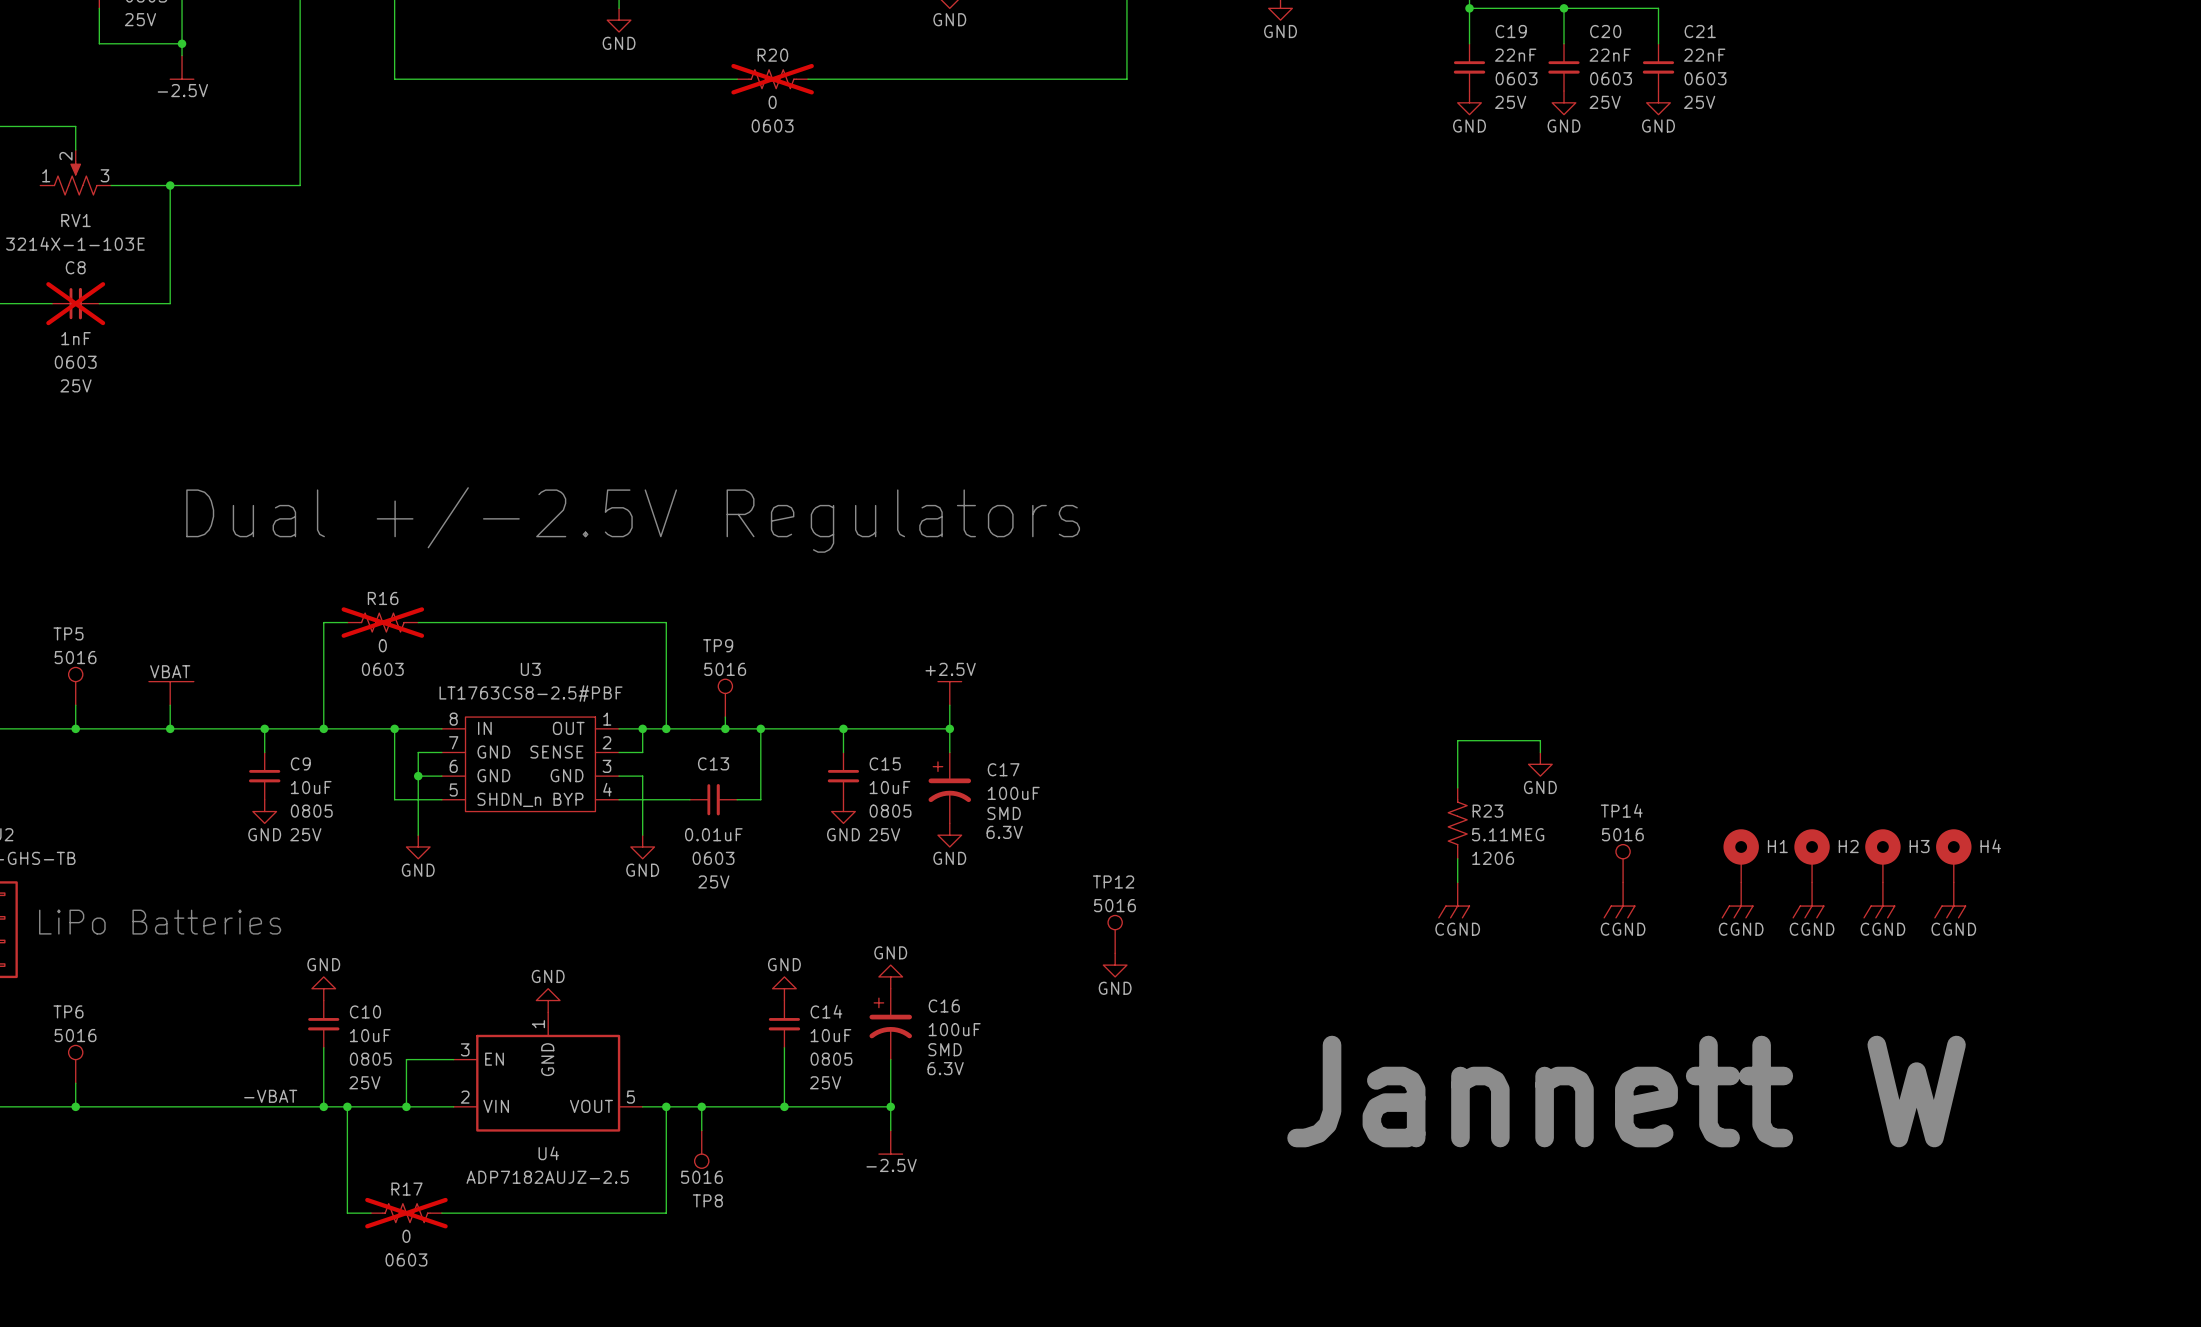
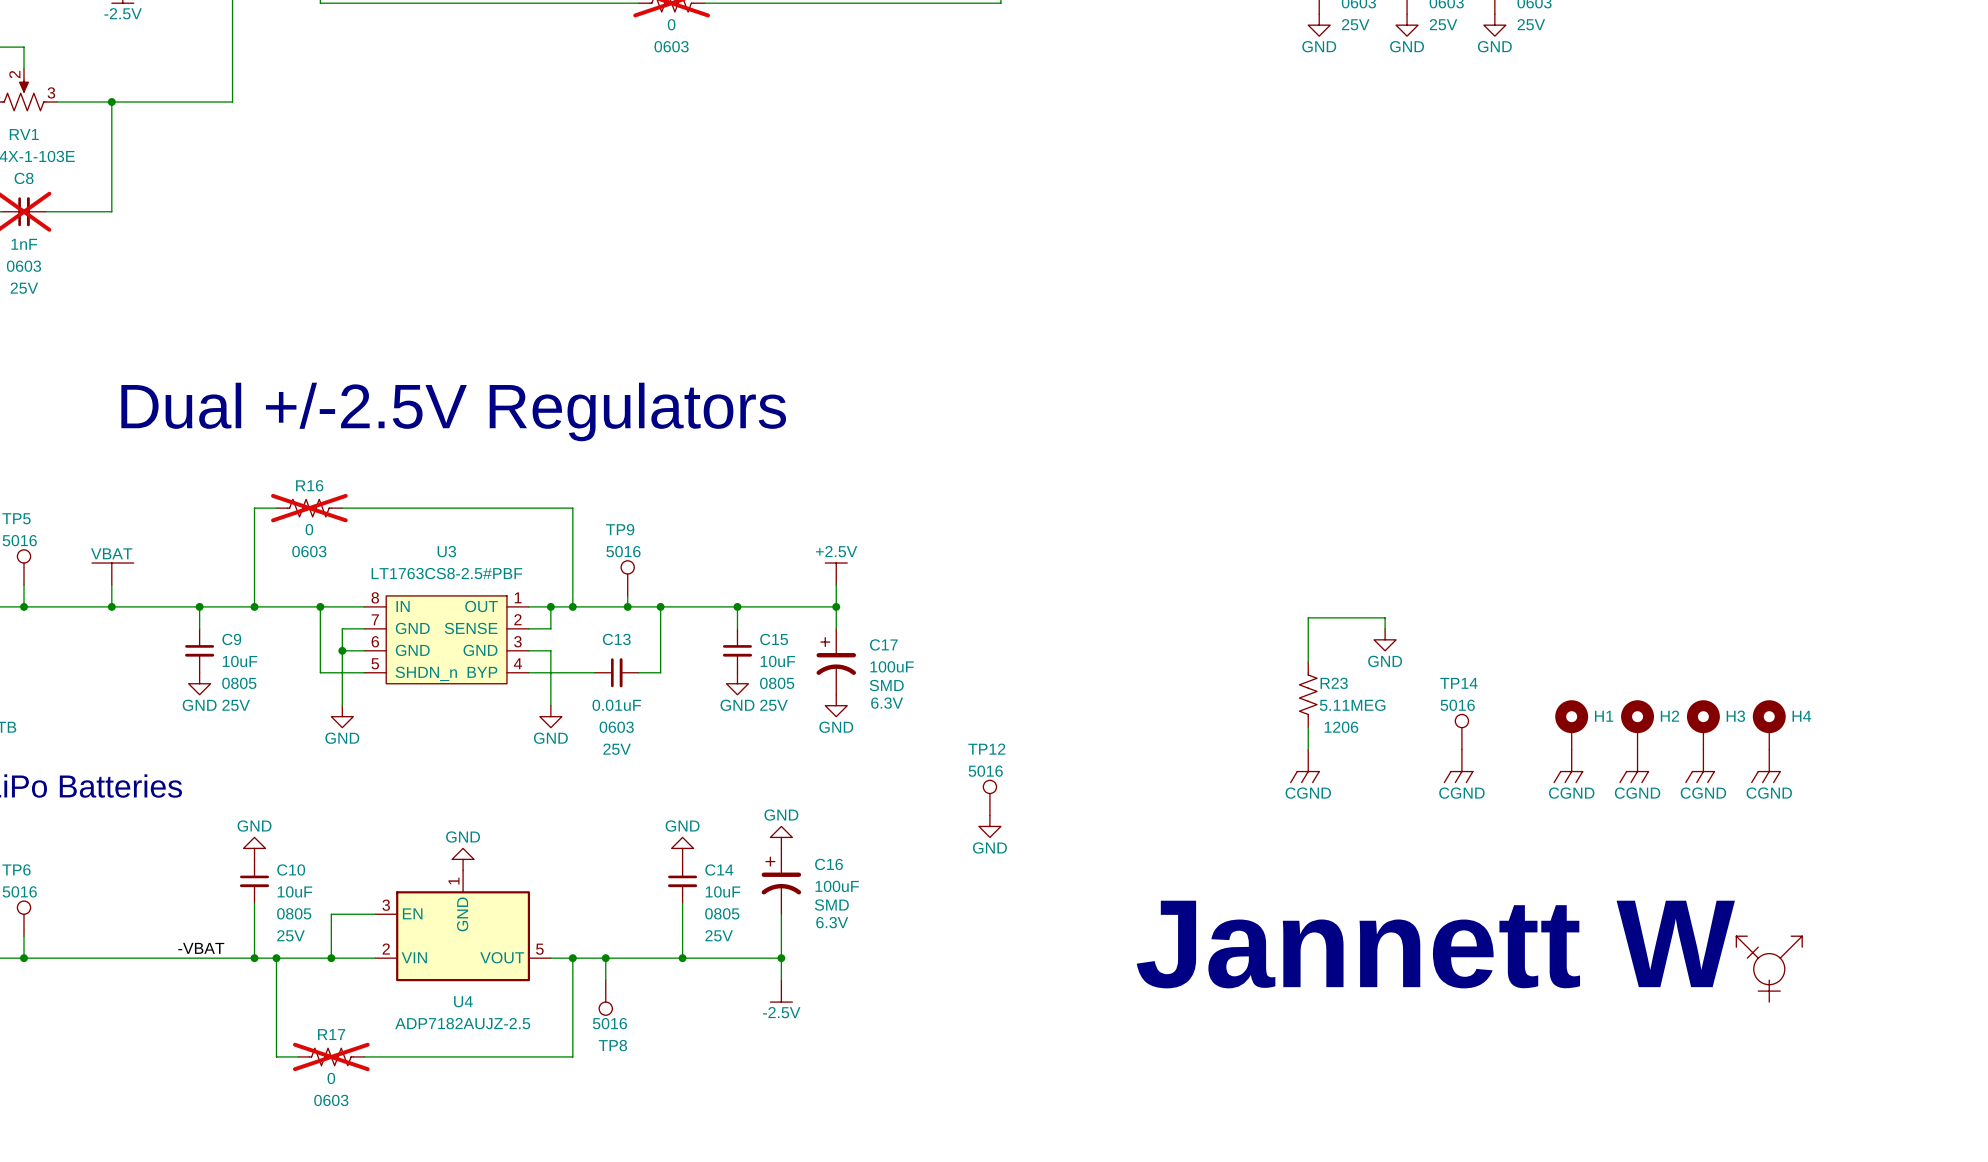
part: none -> (1769, 969)

